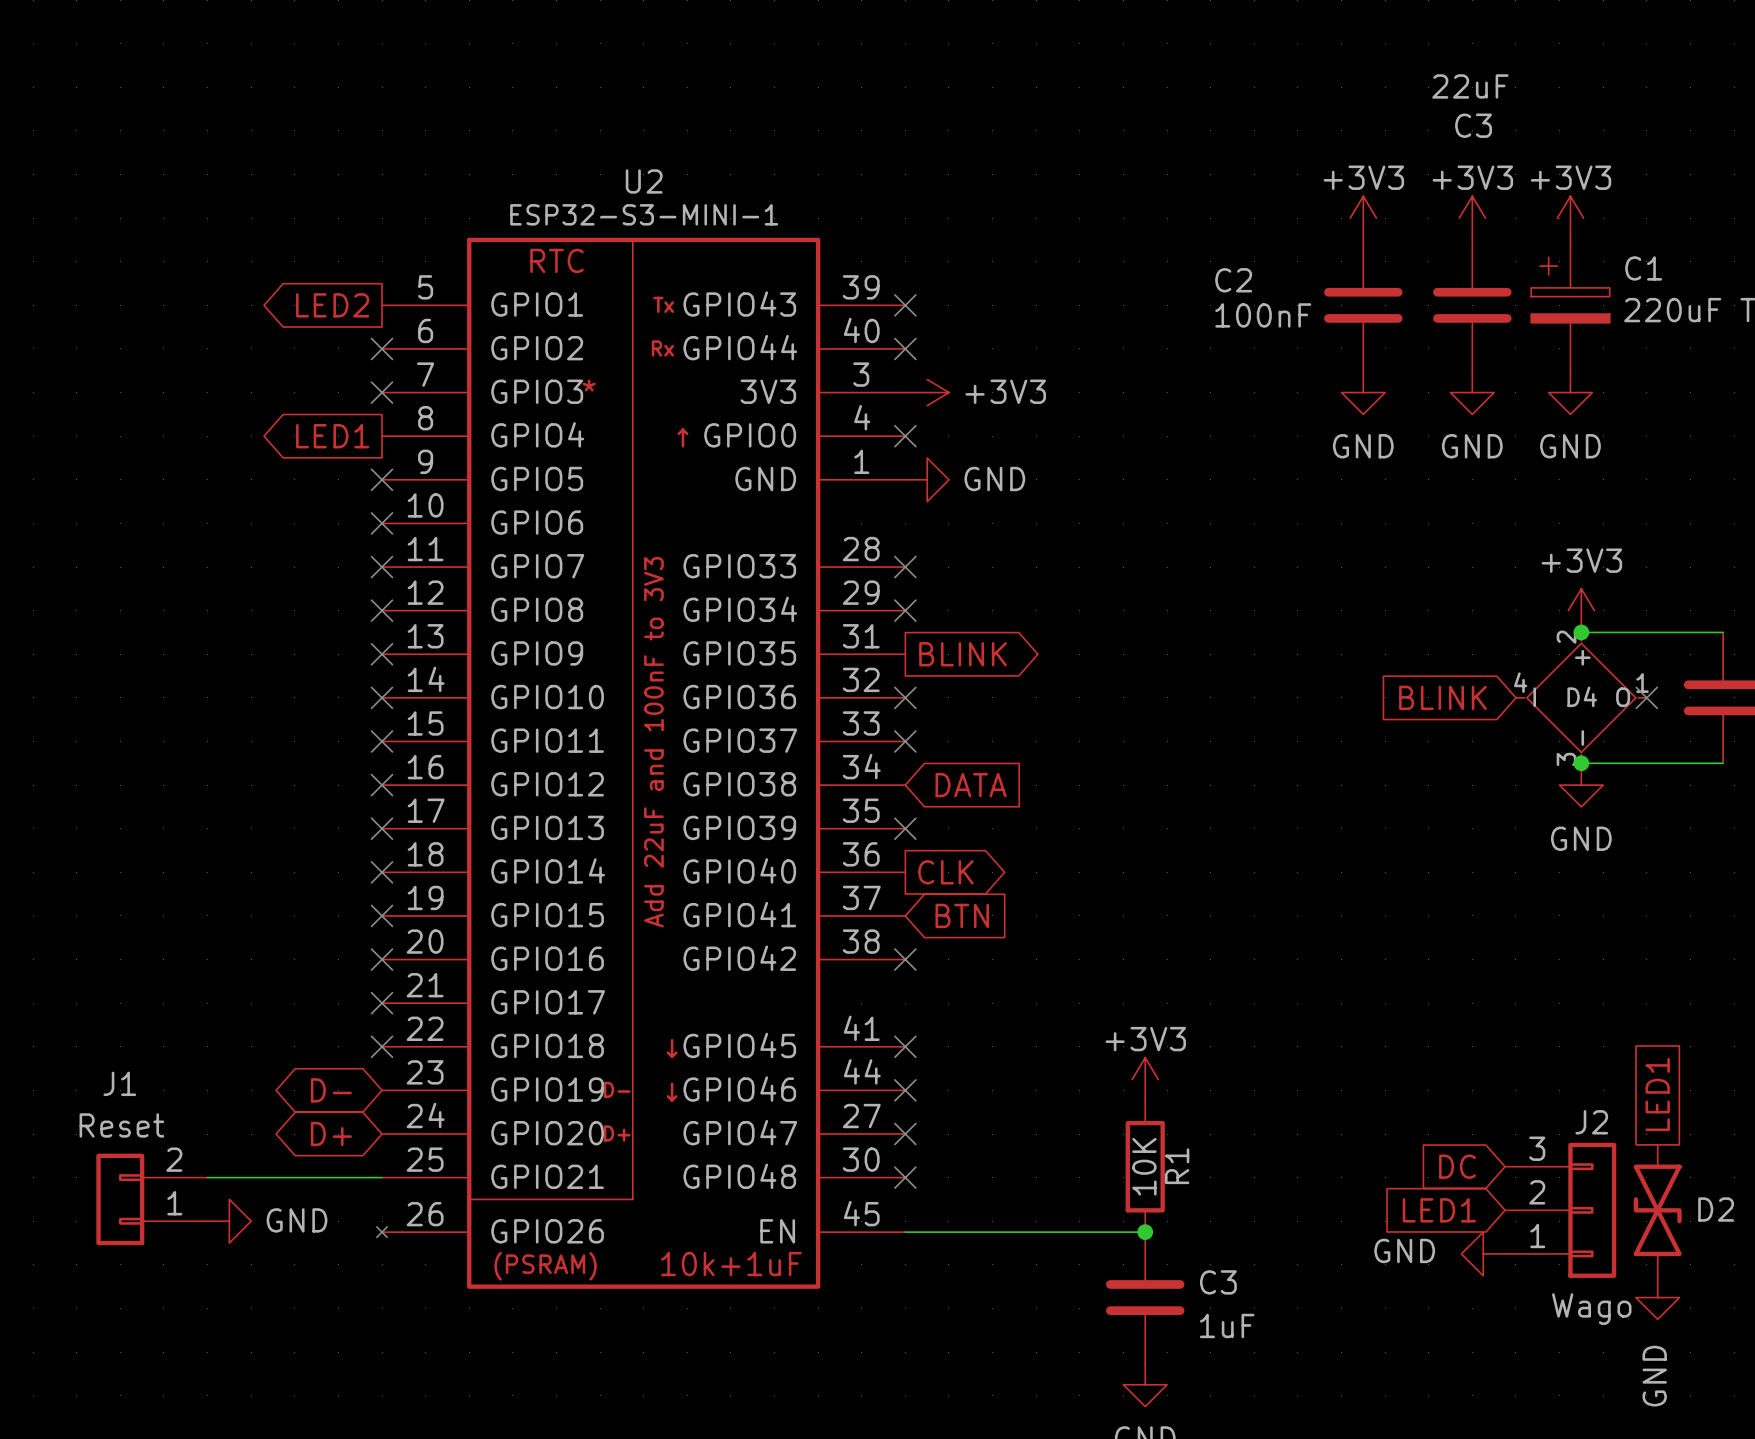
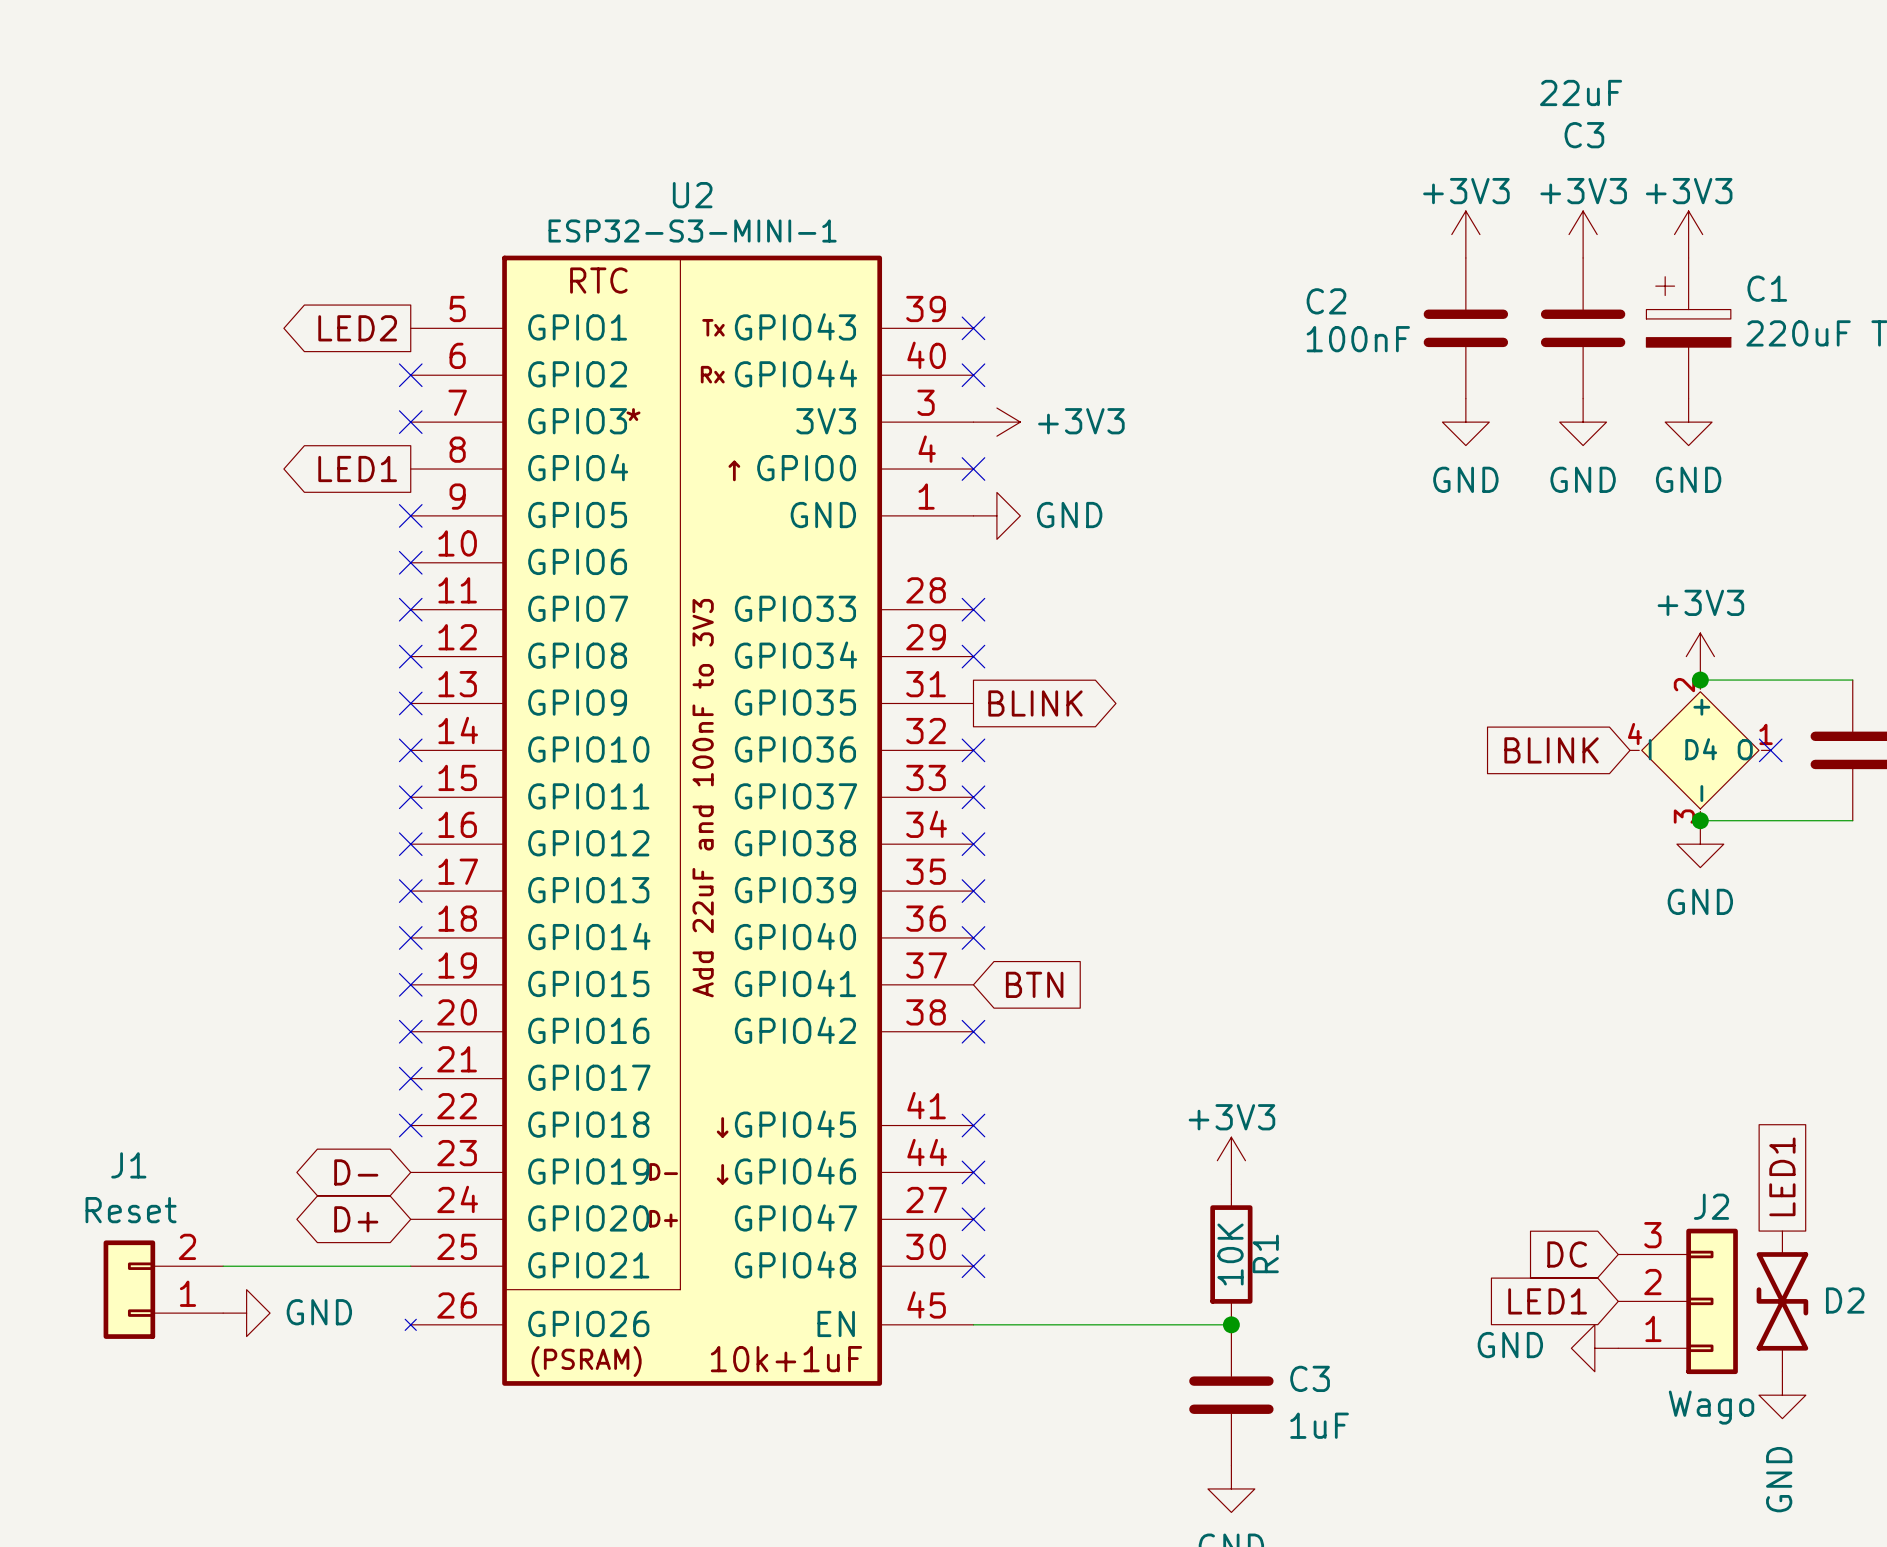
no-connect mark: none -> (973, 844)
global label: DATA (971, 785) -> none
no-connect mark: none -> (973, 937)
global label: CLK (945, 872) -> none

